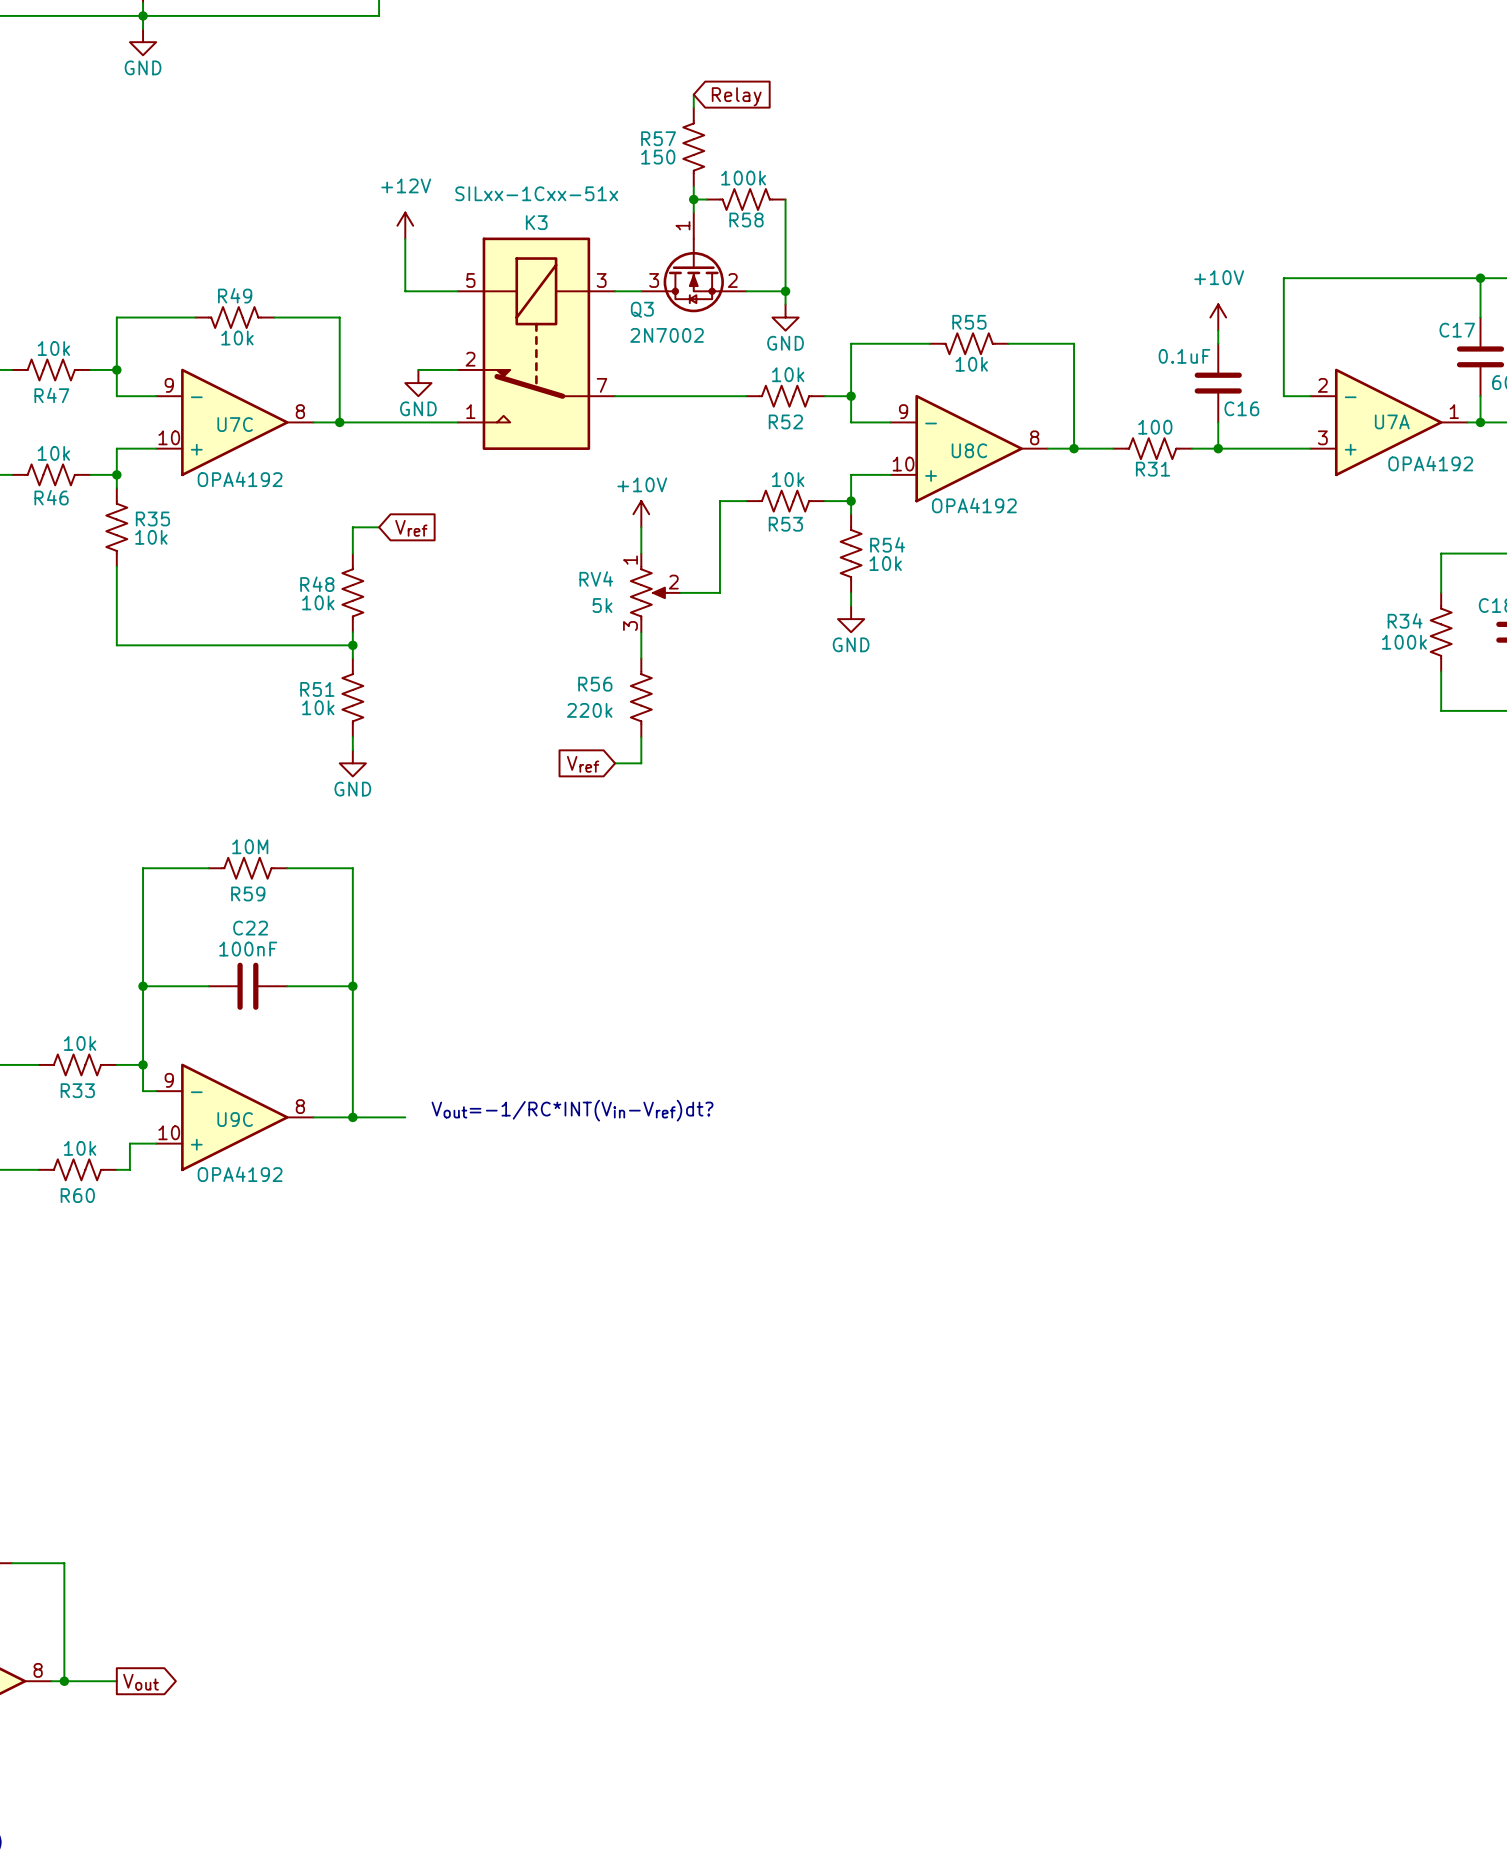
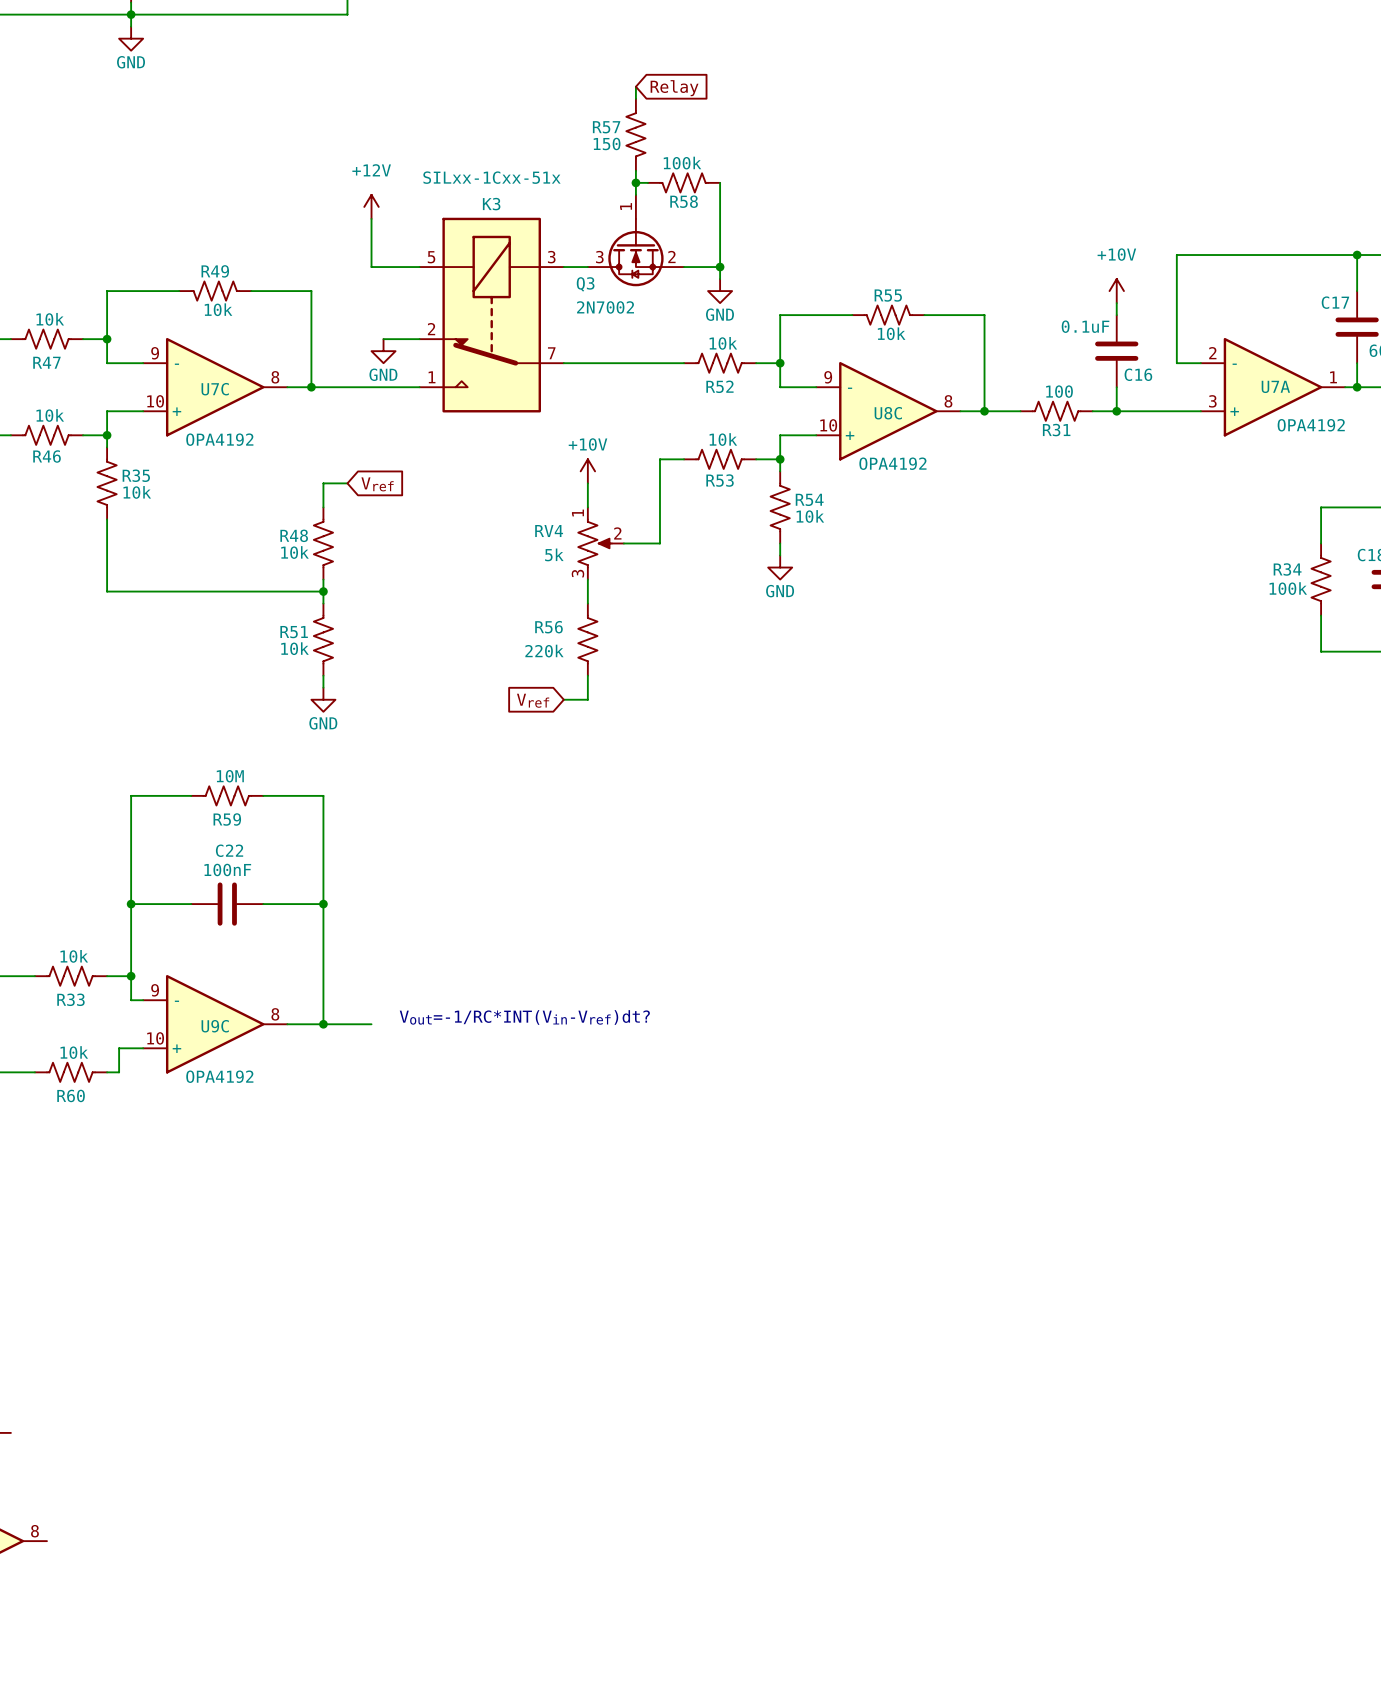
wire: (11, 1563) (64, 1563) (64, 1681) -> none
wire: (51, 1681) (116, 1681) -> none
junction: (64, 1681) -> none
global label: Vout (141, 1682) -> none

